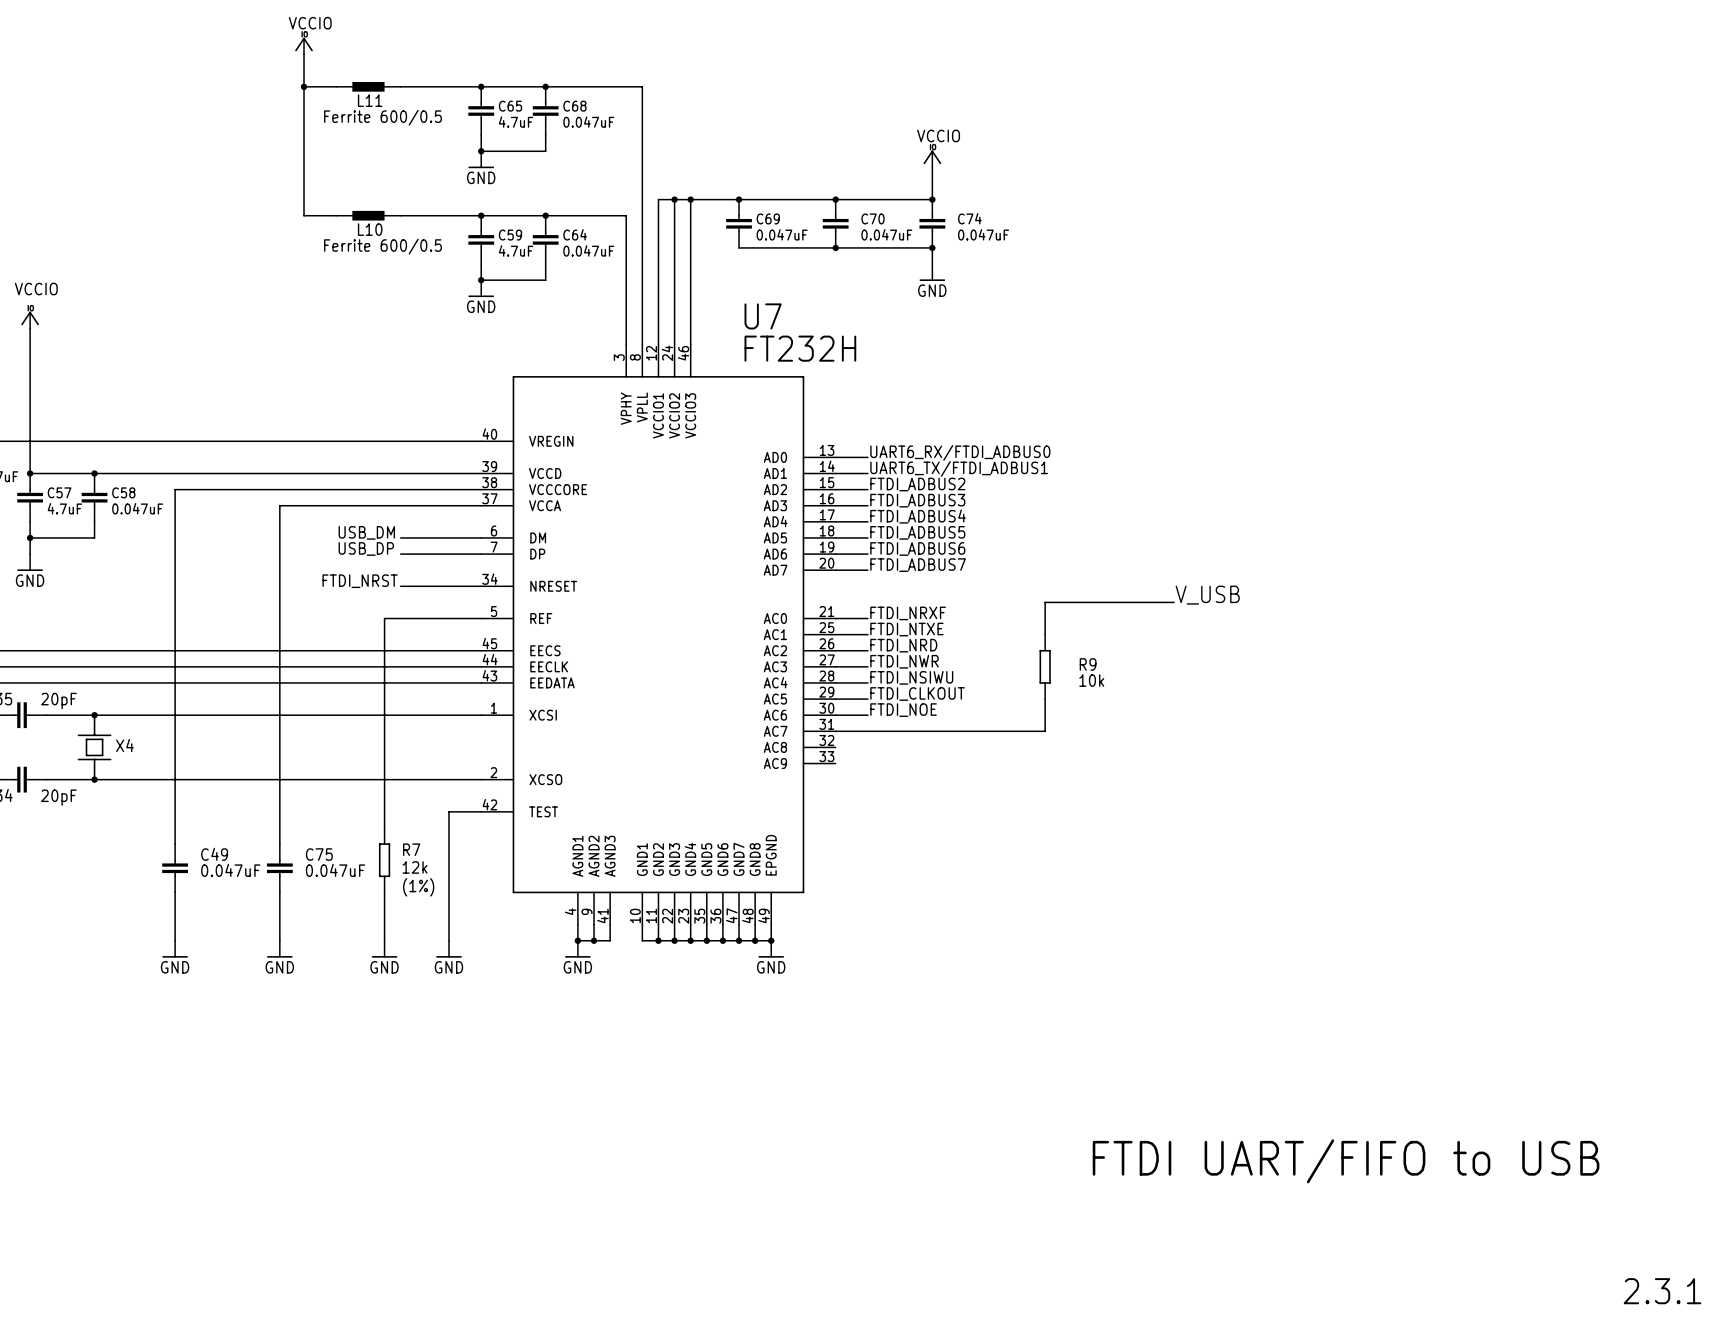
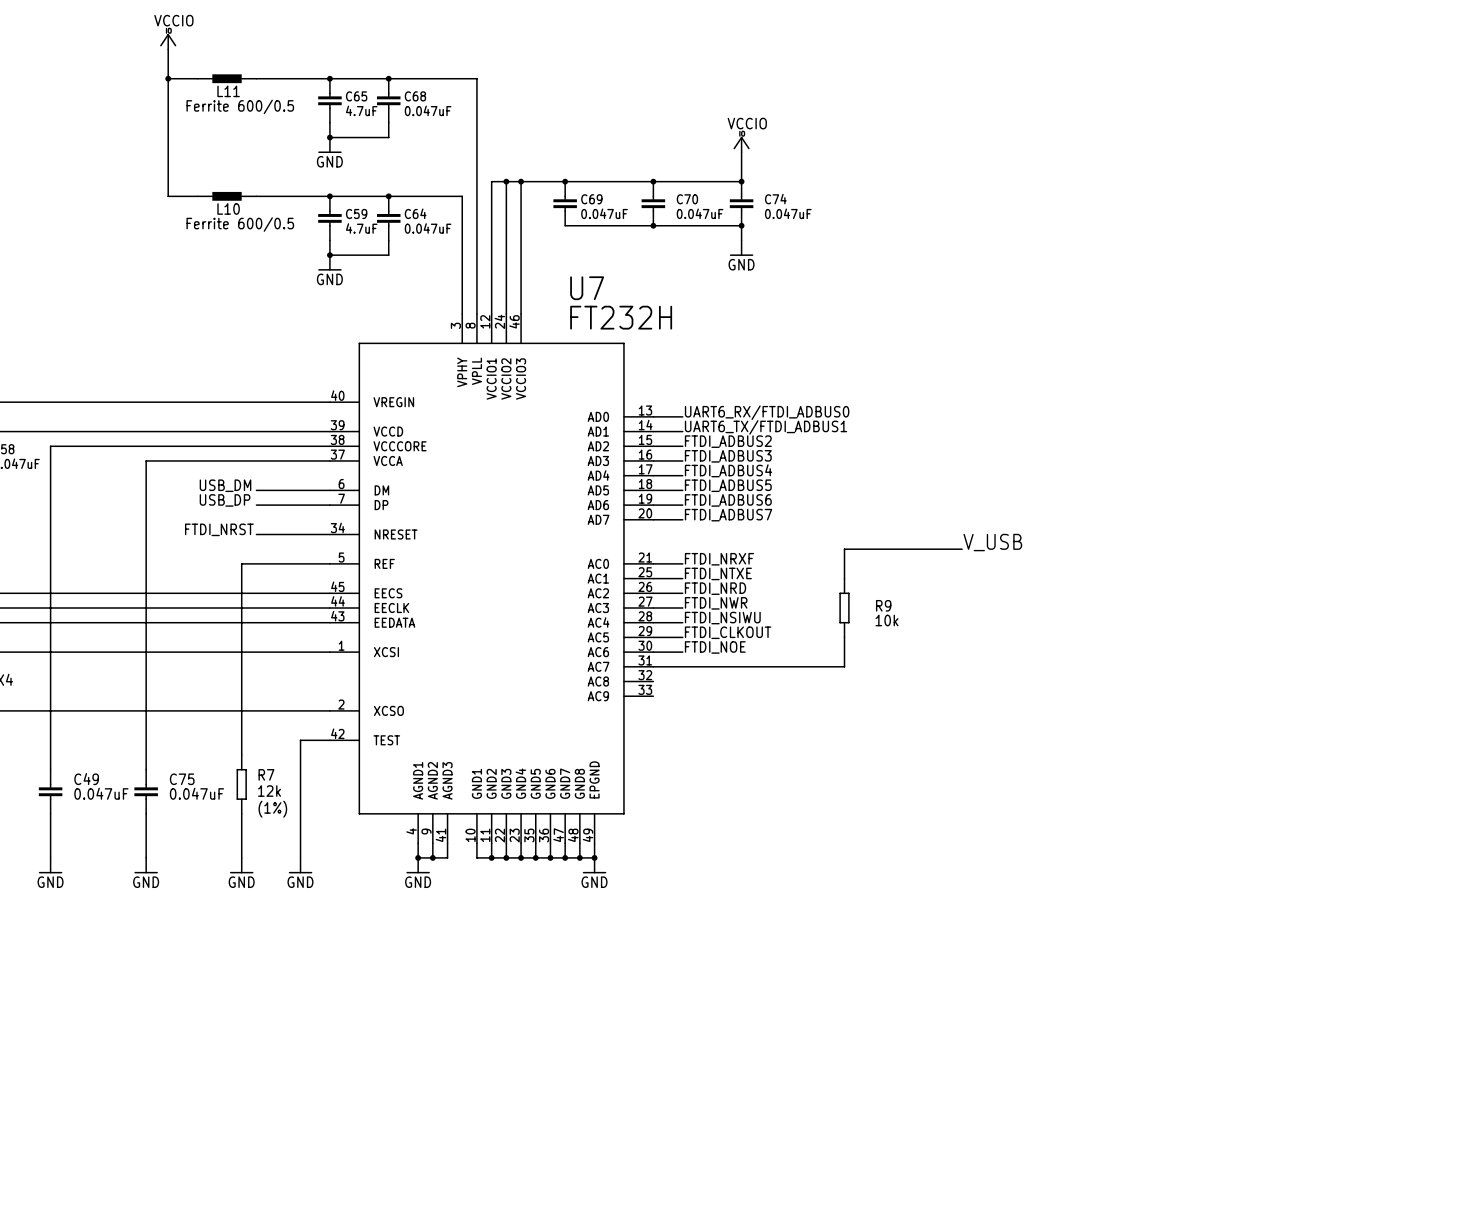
text: FTDI UART/FIFO to USB (1346, 1161) -> none
text: 2.3.1 (1662, 1291) -> none

